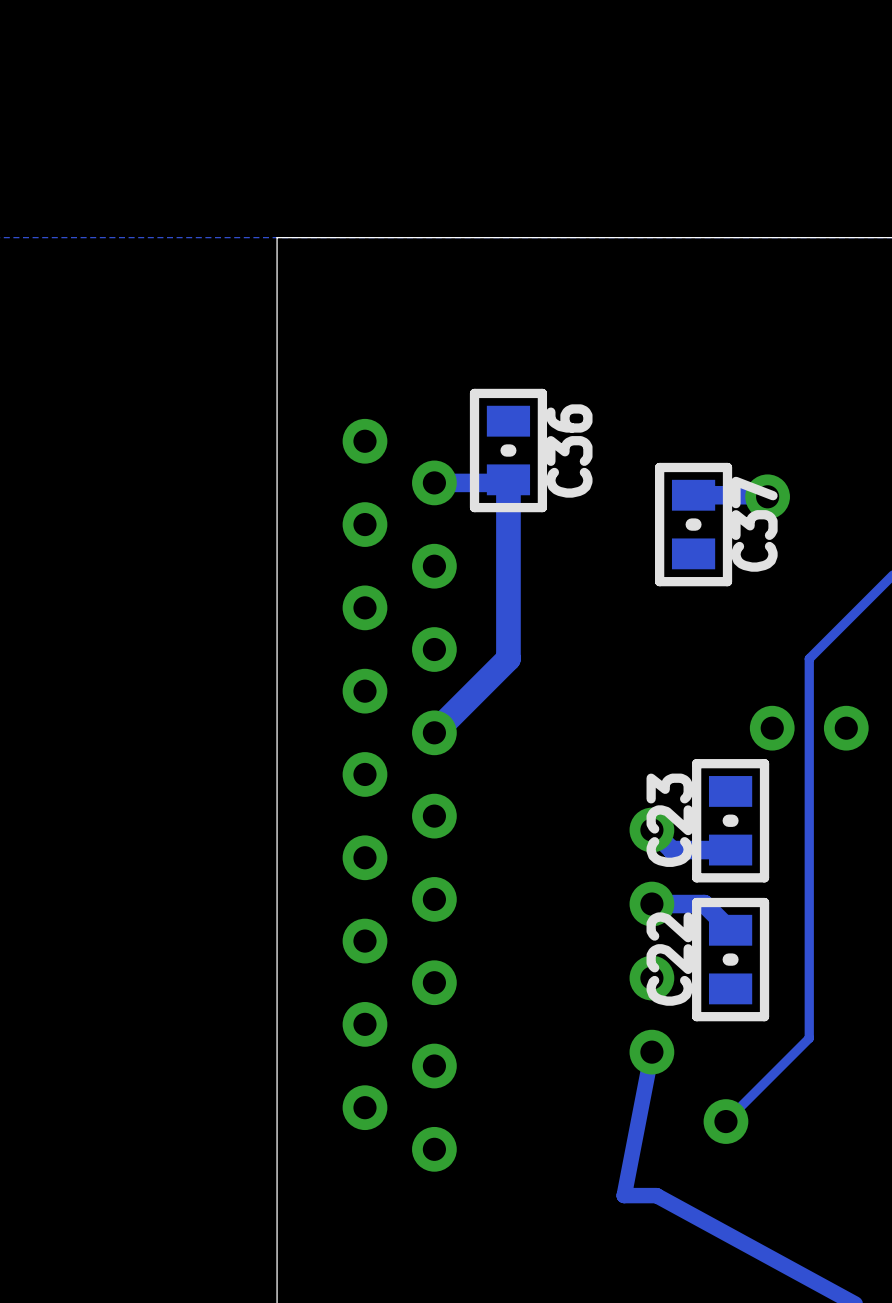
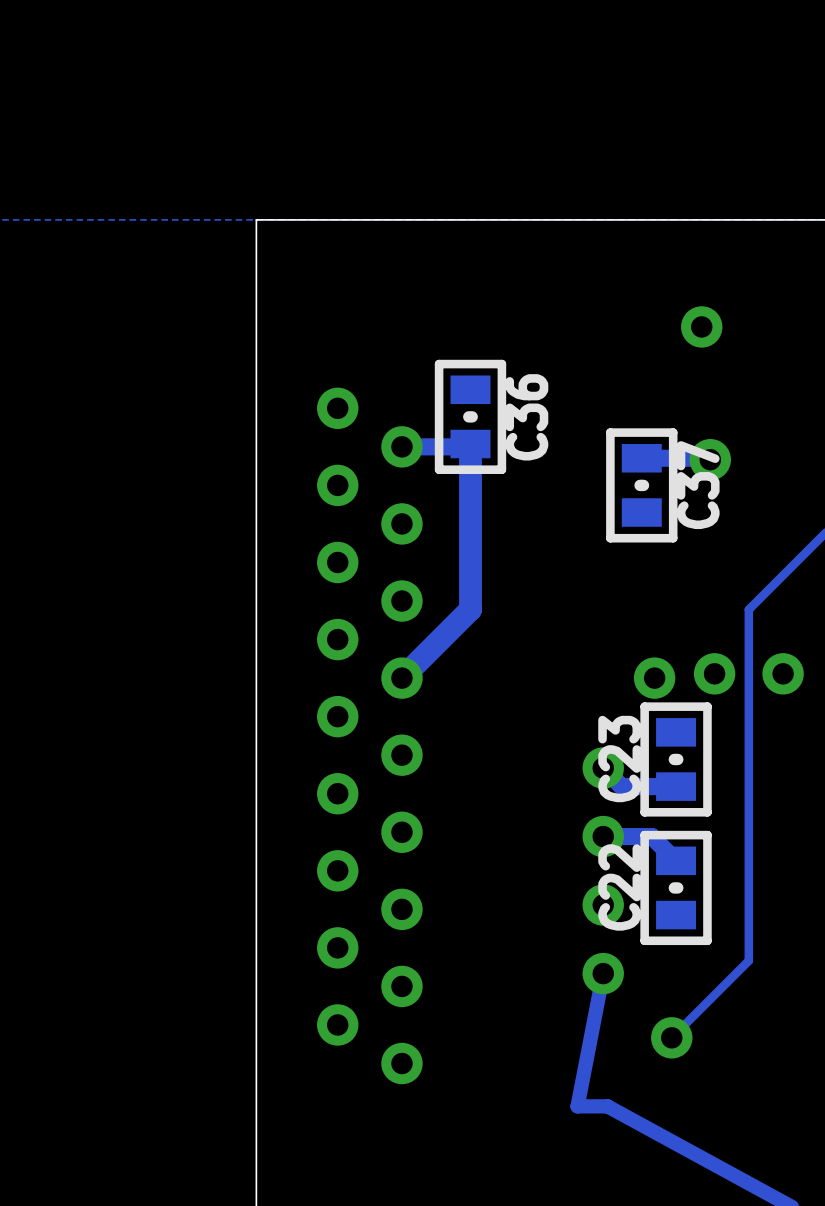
via: none -> (701, 326)
via: none -> (654, 678)

